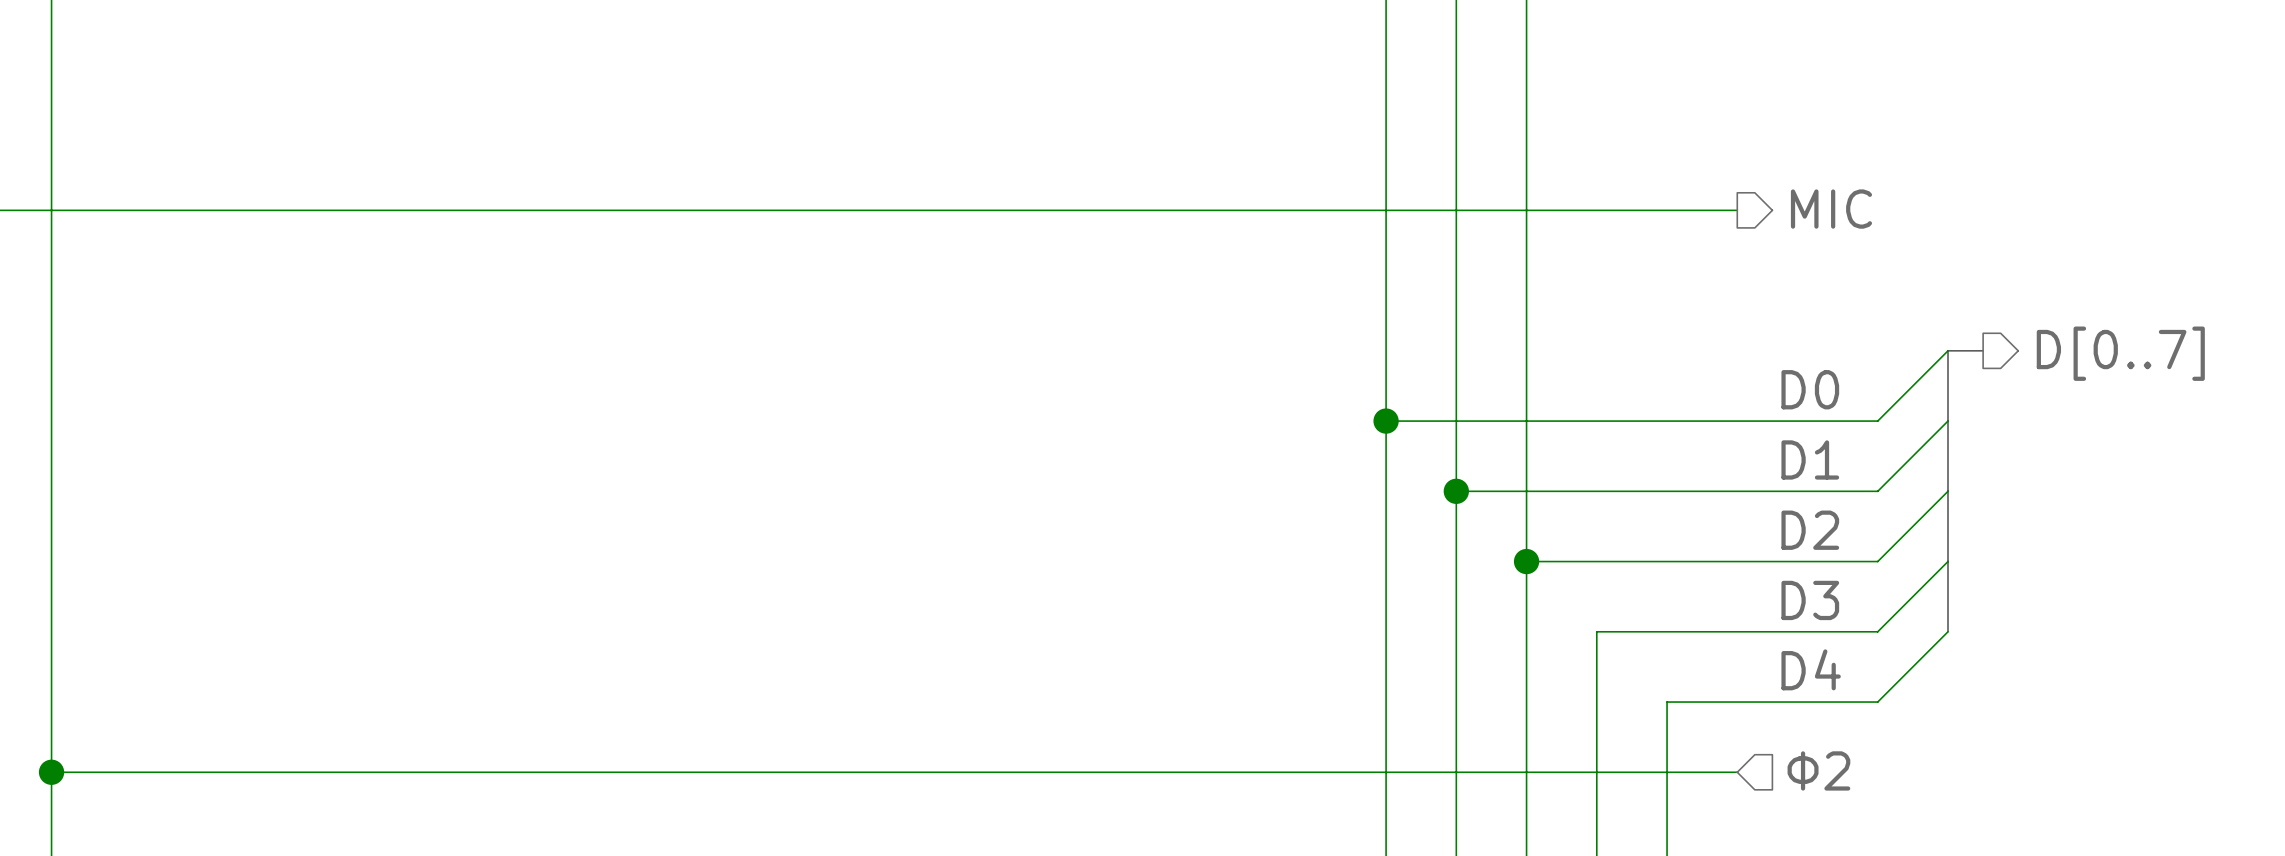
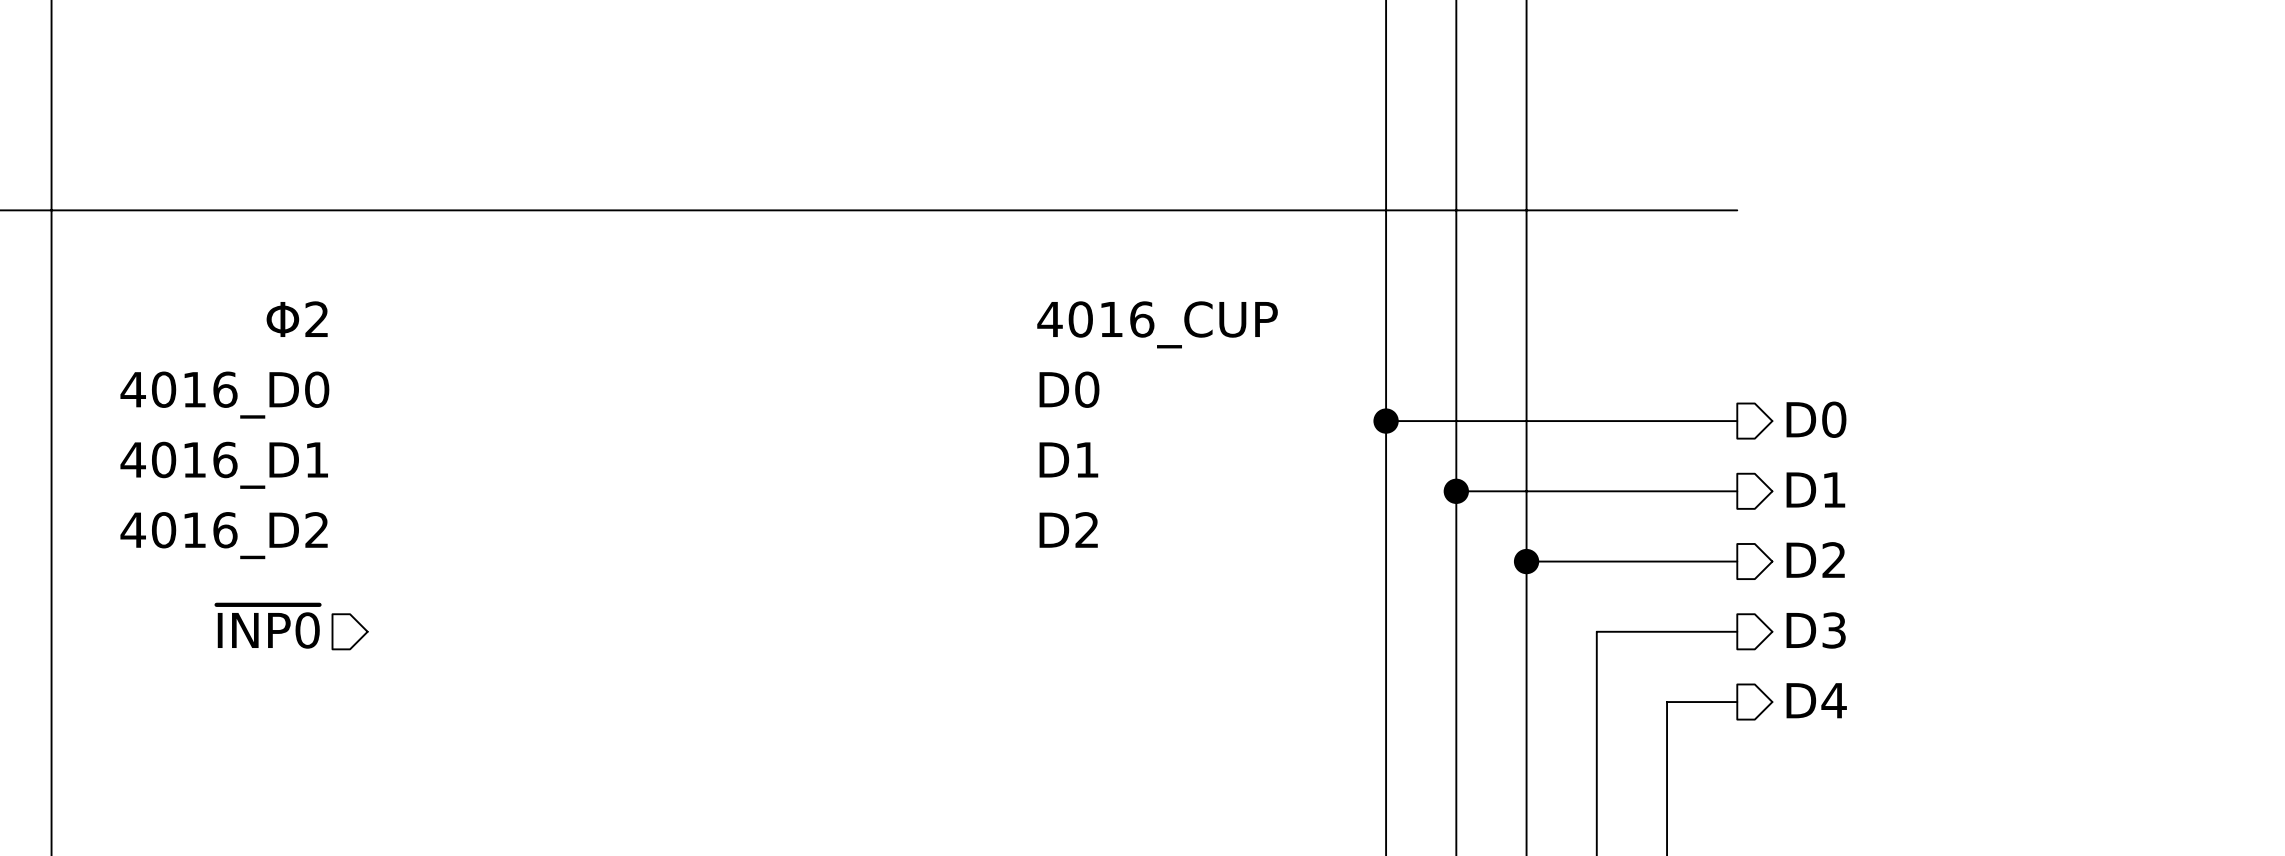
hierarchical label: MIC (1831, 209) -> none
label: none -> Φ2 (297, 319)
label: none -> 4016_CUP (1157, 324)
wire: (1947, 350) (1877, 421) (1737, 421) -> none
bus: (1983, 350) (1947, 350) (1947, 631) -> none
hierarchical label: D[0..7] (2120, 353) -> none
label: none -> D0 (1069, 389)
label: D0 (1810, 389) -> none
label: none -> 4016_D0 (224, 395)
hierarchical label: none -> D0 (1816, 419)
wire: (1947, 421) (1877, 491) (1737, 491) -> none
label: none -> D1 (1068, 459)
label: D1 (1810, 459) -> none
label: none -> 4016_D1 (224, 465)
hierarchical label: none -> D1 (1815, 490)
wire: (1947, 491) (1877, 561) (1737, 561) -> none
label: none -> D2 (1068, 529)
label: D2 (1810, 530) -> none
label: none -> 4016_D2 (224, 535)
hierarchical label: none -> D2 (1815, 559)
wire: (1947, 561) (1877, 631) (1737, 631) -> none
label: D3 (1810, 600) -> none
hierarchical label: none -> ~{INP0} (268, 626)
hierarchical label: none -> D3 (1816, 630)
wire: (1947, 631) (1877, 702) (1737, 702) -> none
label: D4 (1811, 669) -> none
hierarchical label: none -> D4 (1816, 700)
hierarchical label: Φ2 (1818, 770) -> none
wire: (51, 772) (1737, 772) -> none
junction: (51, 772) -> none

